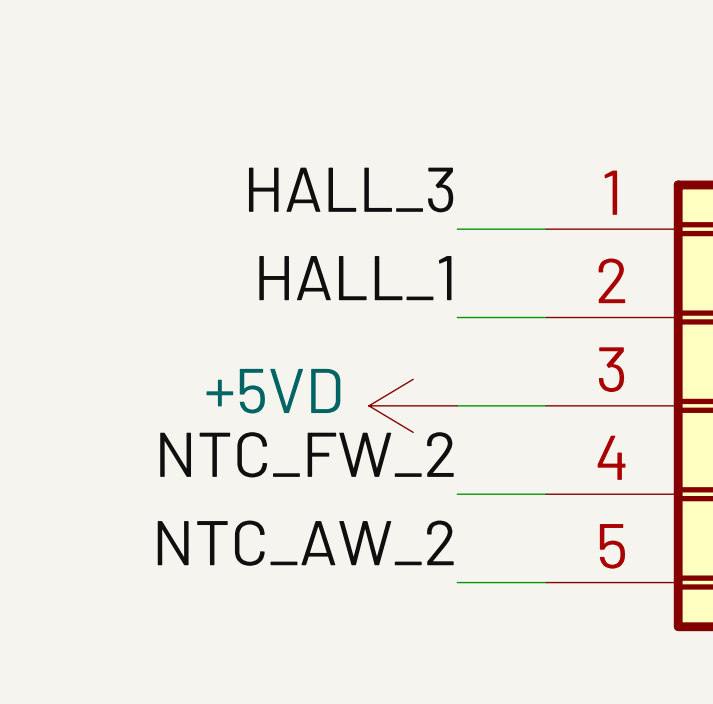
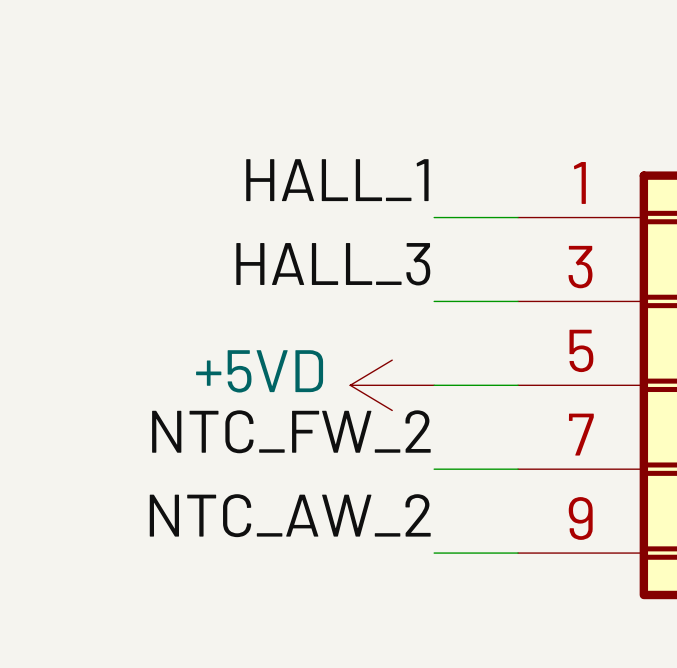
label: HALL_3 (351, 189) -> HALL_1 (337, 180)
label: HALL_1 (355, 278) -> HALL_3 (333, 264)
part pin number: 2 (611, 280) -> 3 (580, 267)
part pin number: 3 (611, 369) -> 5 (581, 350)
part pin number: 4 (611, 457) -> 7 (581, 434)
part pin number: 5 (612, 546) -> 9 (580, 518)

